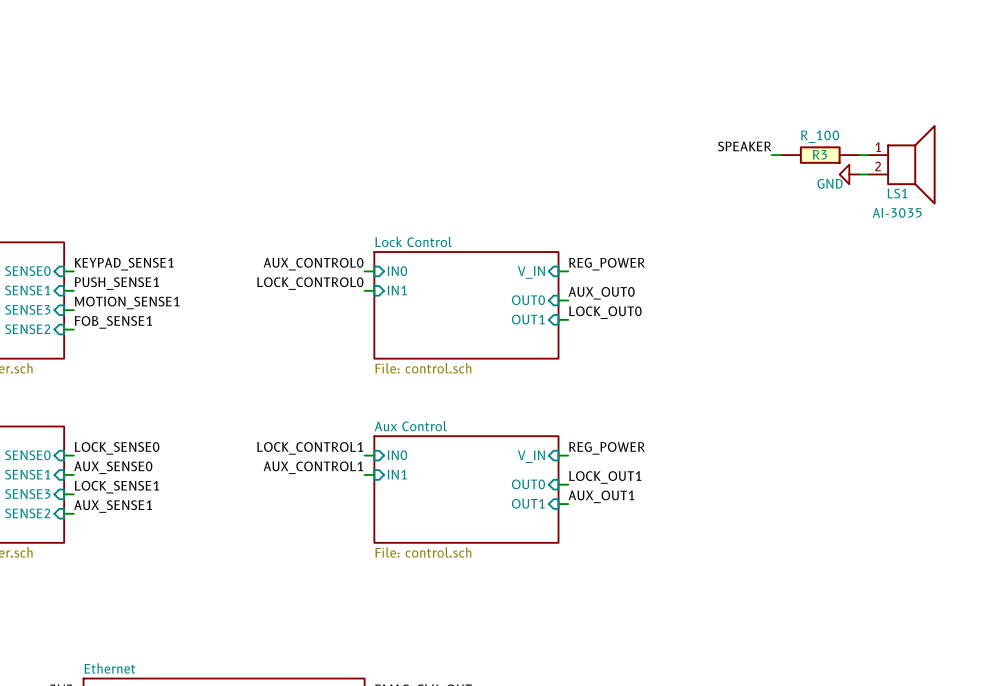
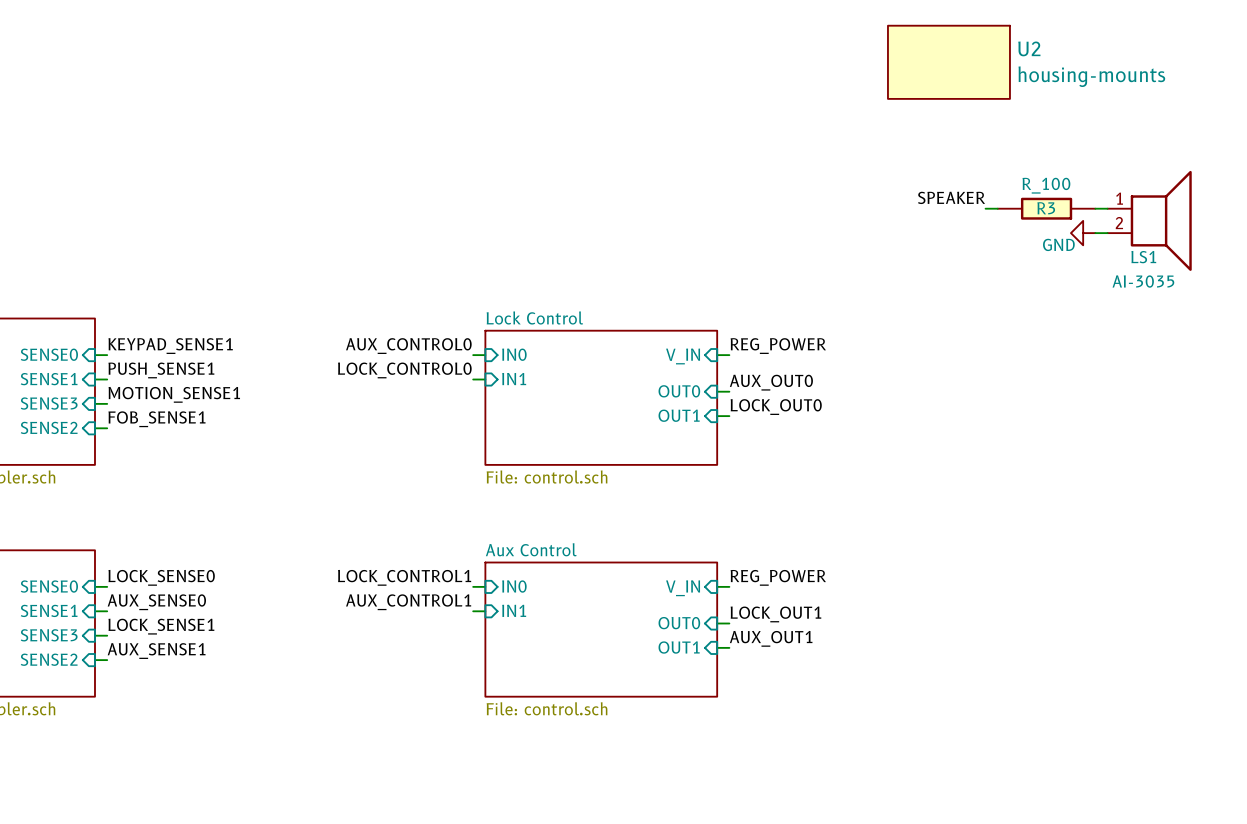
U2: none -> housing-mounts (948, 62)

